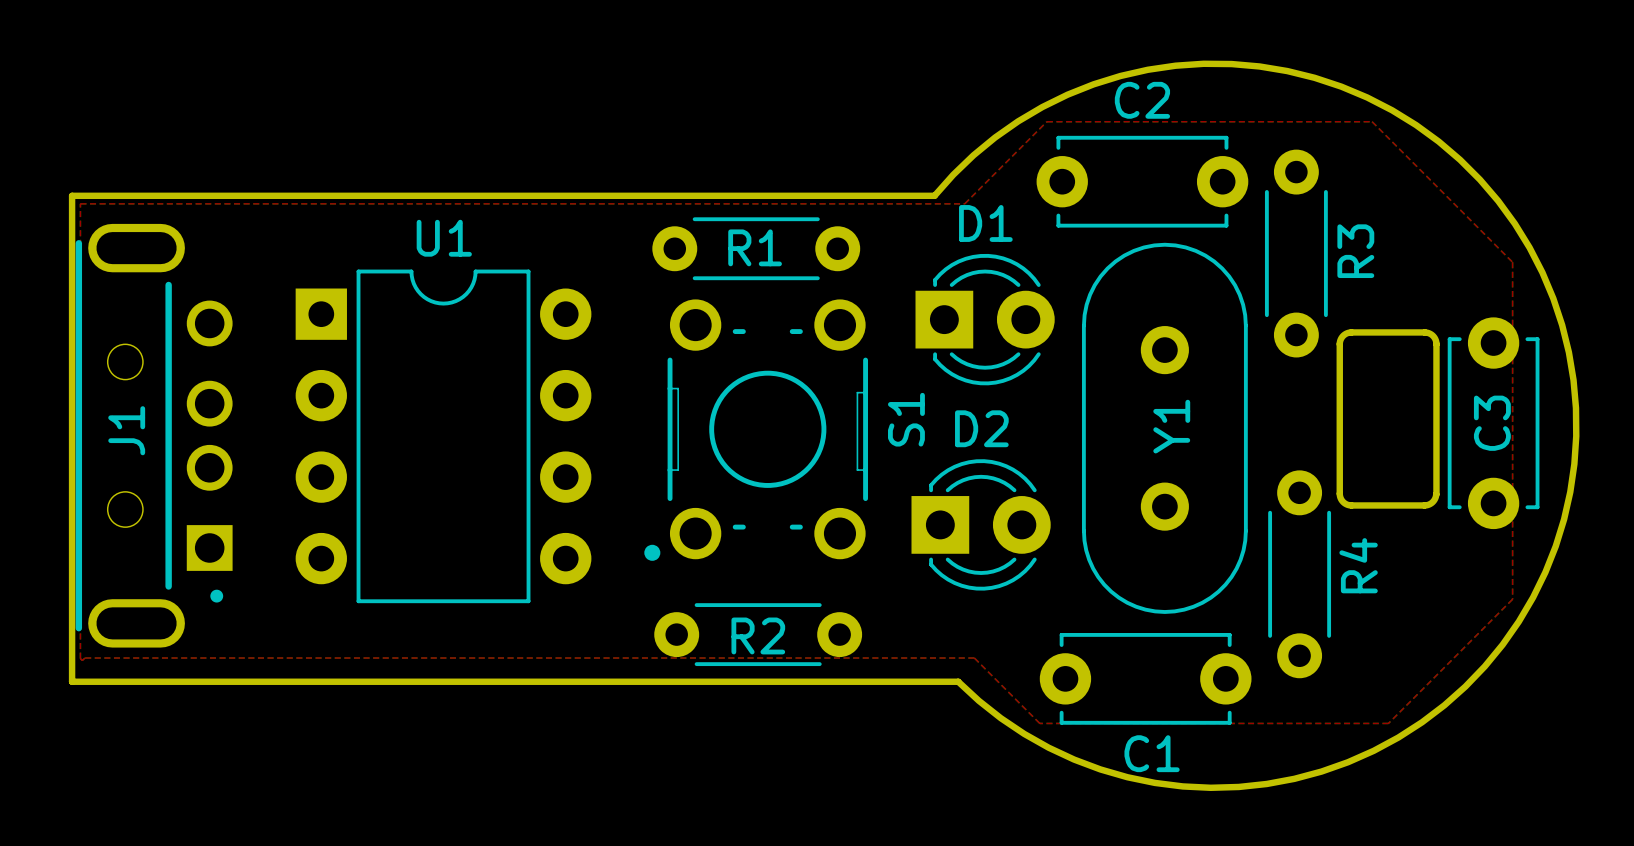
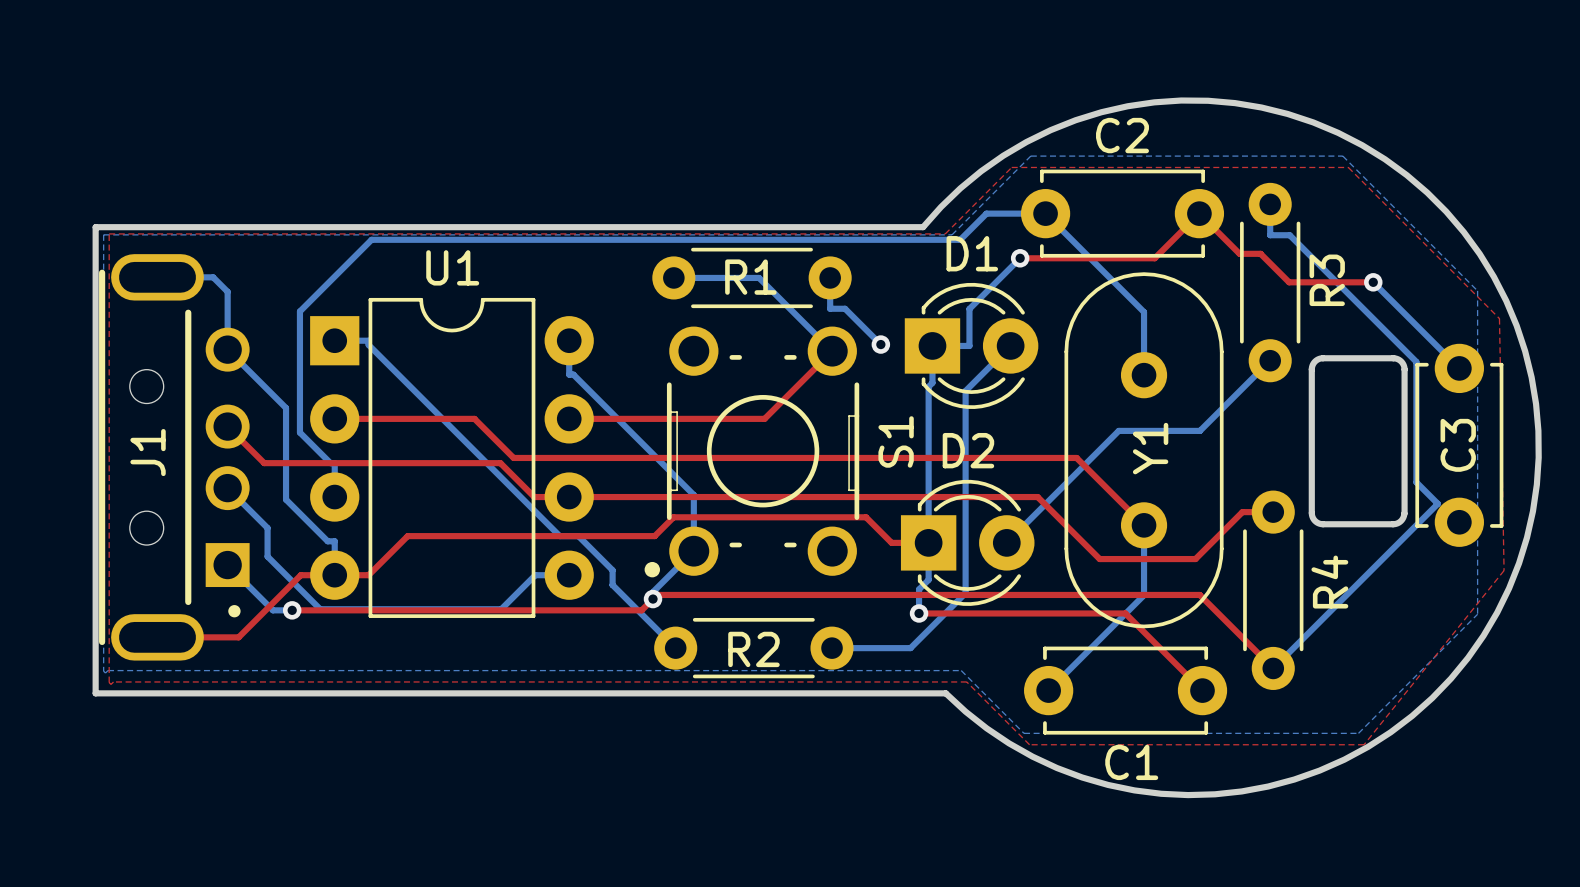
top zone outline: (1046, 121) (964, 203) (80, 203) (80, 658) (82, 660) (84, 658) (974, 658) (1039, 723) (1388, 723) (1512, 599) (1512, 262) (1372, 121) (1046, 121) -> (1011, 167) (945, 233) (109, 233) (109, 682) (111, 684) (113, 681) (966, 681) (1029, 744) (1364, 744) (1504, 570) (1499, 318) (1348, 167) (1011, 167)
bottom track: none -> (1270, 204) (1270, 235) (1289, 235) (1416, 361) (1416, 482) (1437, 503) (1273, 668)
top track: none -> (1020, 258) (1154, 258) (1199, 213) (1239, 253) (1260, 253) (1289, 282) (1373, 282)
bottom track: none -> (1020, 258) (969, 308) (969, 345) (932, 345) (932, 382) (928, 386) (928, 579) (919, 589) (919, 613)
via: none -> (1020, 258)
bottom track: none -> (157, 277) (213, 277) (227, 291) (227, 349) (286, 408) (286, 499) (327, 541) (334, 541) (334, 575)
bottom track: none -> (673, 277) (759, 277) (832, 351)
bottom track: none -> (830, 277) (830, 308) (845, 308) (880, 344)
bottom track: none -> (1373, 282) (1459, 368)
via: none -> (1373, 282)
bottom track: none -> (334, 340) (368, 340) (368, 344) (559, 536) (578, 536) (612, 570) (612, 585) (675, 648)
bottom track: none -> (569, 340) (569, 374) (573, 374) (693, 495) (693, 551) (653, 592) (653, 599)
via: none -> (880, 344)
bottom track: none -> (1010, 345) (965, 390) (965, 593) (910, 648) (832, 648)
top track: none -> (832, 351) (764, 418) (569, 418)
bottom track: none -> (1270, 360) (1200, 430) (1118, 430) (1006, 542)
bottom track: none -> (1144, 375) (1144, 312) (1045, 213) (986, 213) (960, 239) (371, 239) (299, 311) (299, 432) (330, 463) (334, 463) (334, 497)
top track: none -> (334, 418) (474, 418) (513, 457) (1076, 457) (1144, 525)
top track: none -> (227, 426) (264, 463) (500, 463) (534, 497) (1037, 497) (1099, 559) (1195, 559) (1242, 512) (1273, 512)
bottom track: none -> (227, 488) (267, 528) (267, 556) (320, 609) (501, 609) (535, 575) (569, 575)
bottom track: none -> (1144, 525) (1144, 595) (1048, 690)
top track: none -> (928, 542) (891, 542) (866, 517) (673, 517) (654, 536) (407, 536) (368, 575) (300, 575) (238, 637) (157, 637)
bottom track: none -> (227, 565) (272, 610) (292, 610)
via: none -> (653, 599)
top track: none -> (292, 610) (641, 610) (657, 594) (1199, 594) (1273, 668)
via: none -> (292, 610)
top track: none -> (919, 613) (1125, 613) (1202, 690)
via: none -> (919, 613)

